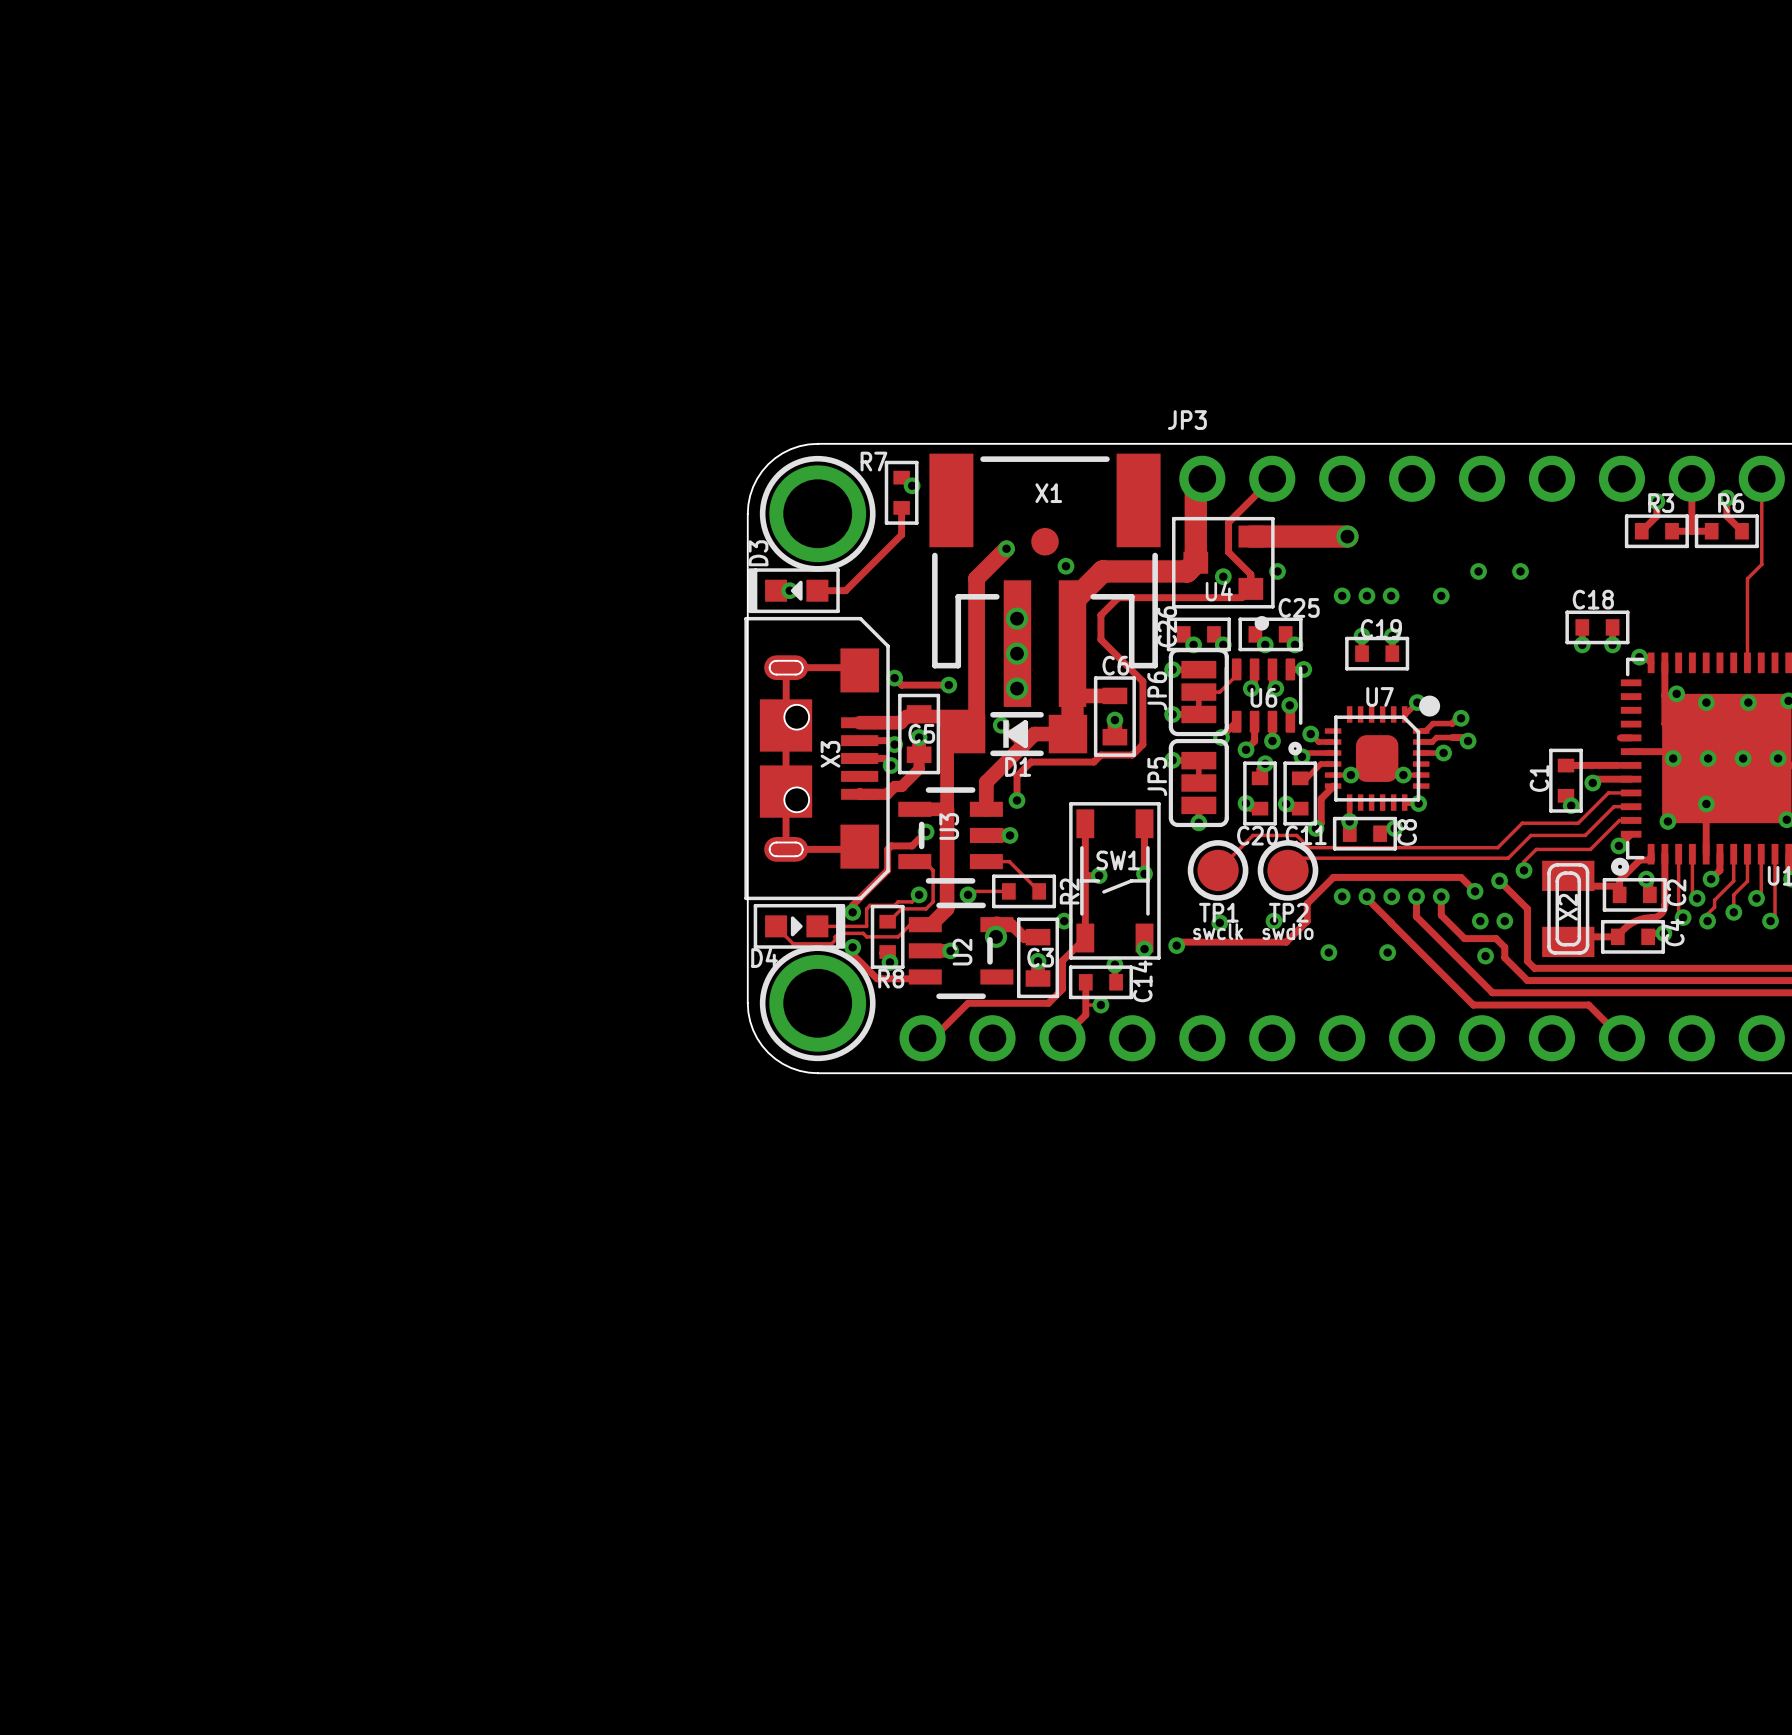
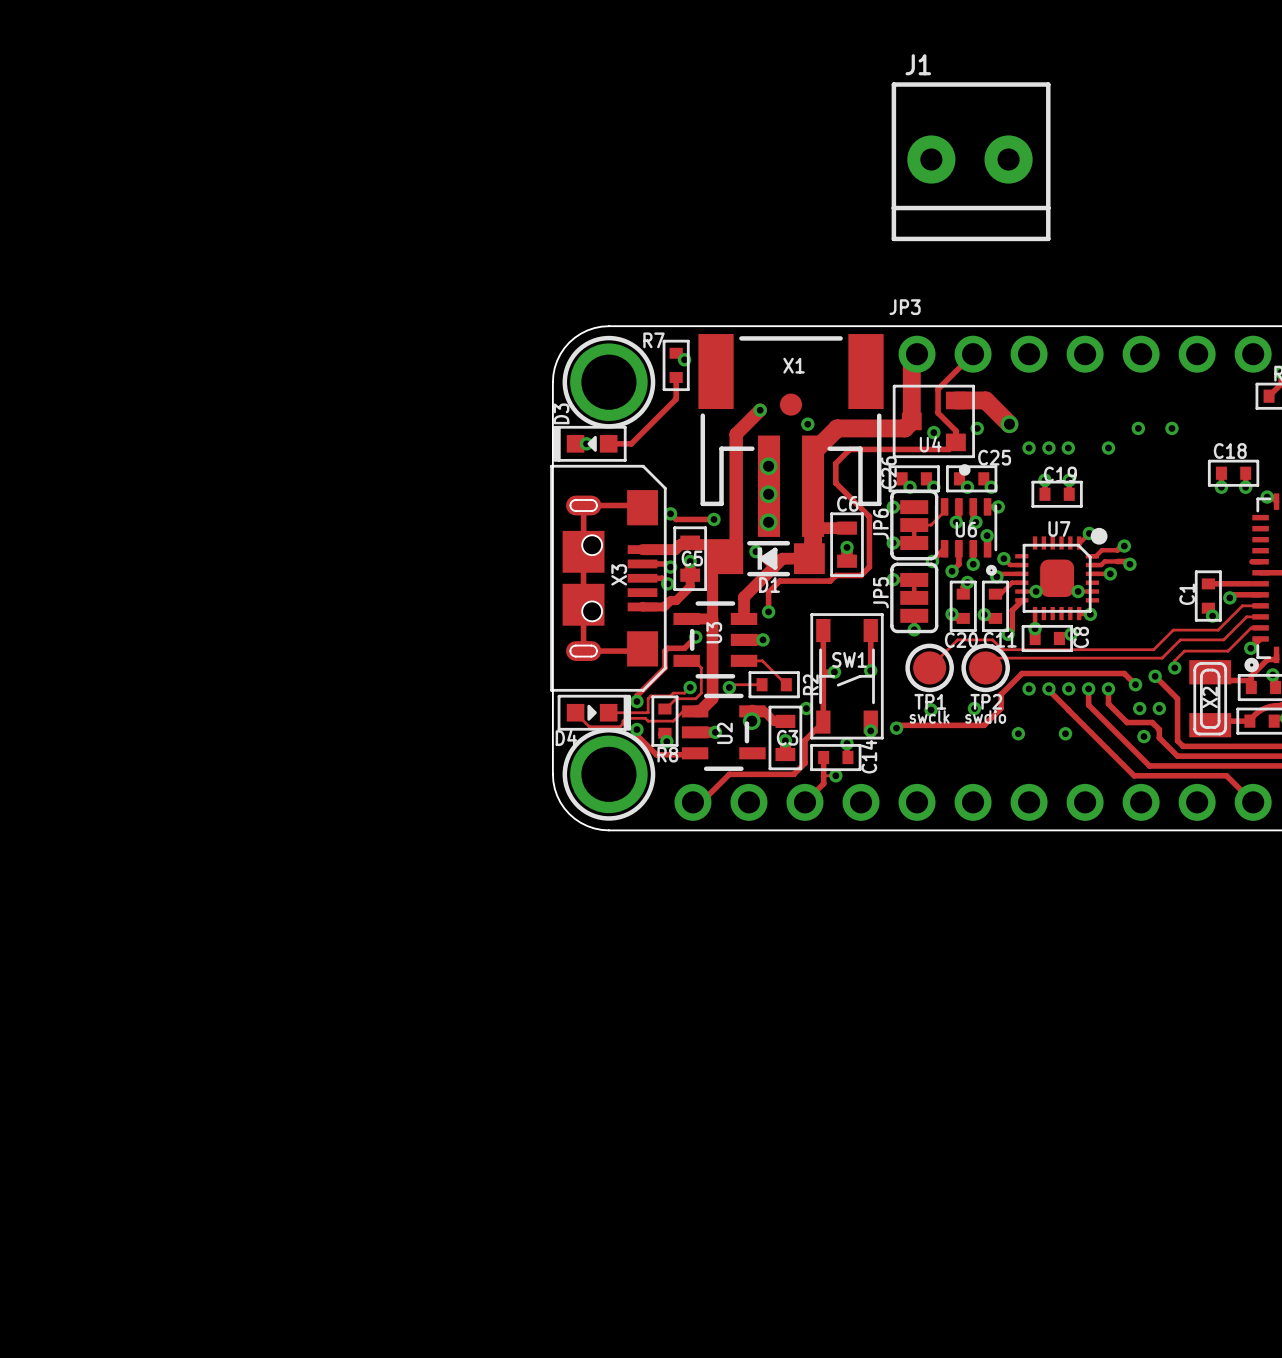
J1: none -> (971, 161)
track: (1288, 536) (1347, 536) -> (985, 400) (1009, 424)
via position: (1347, 536) -> (1009, 424)

